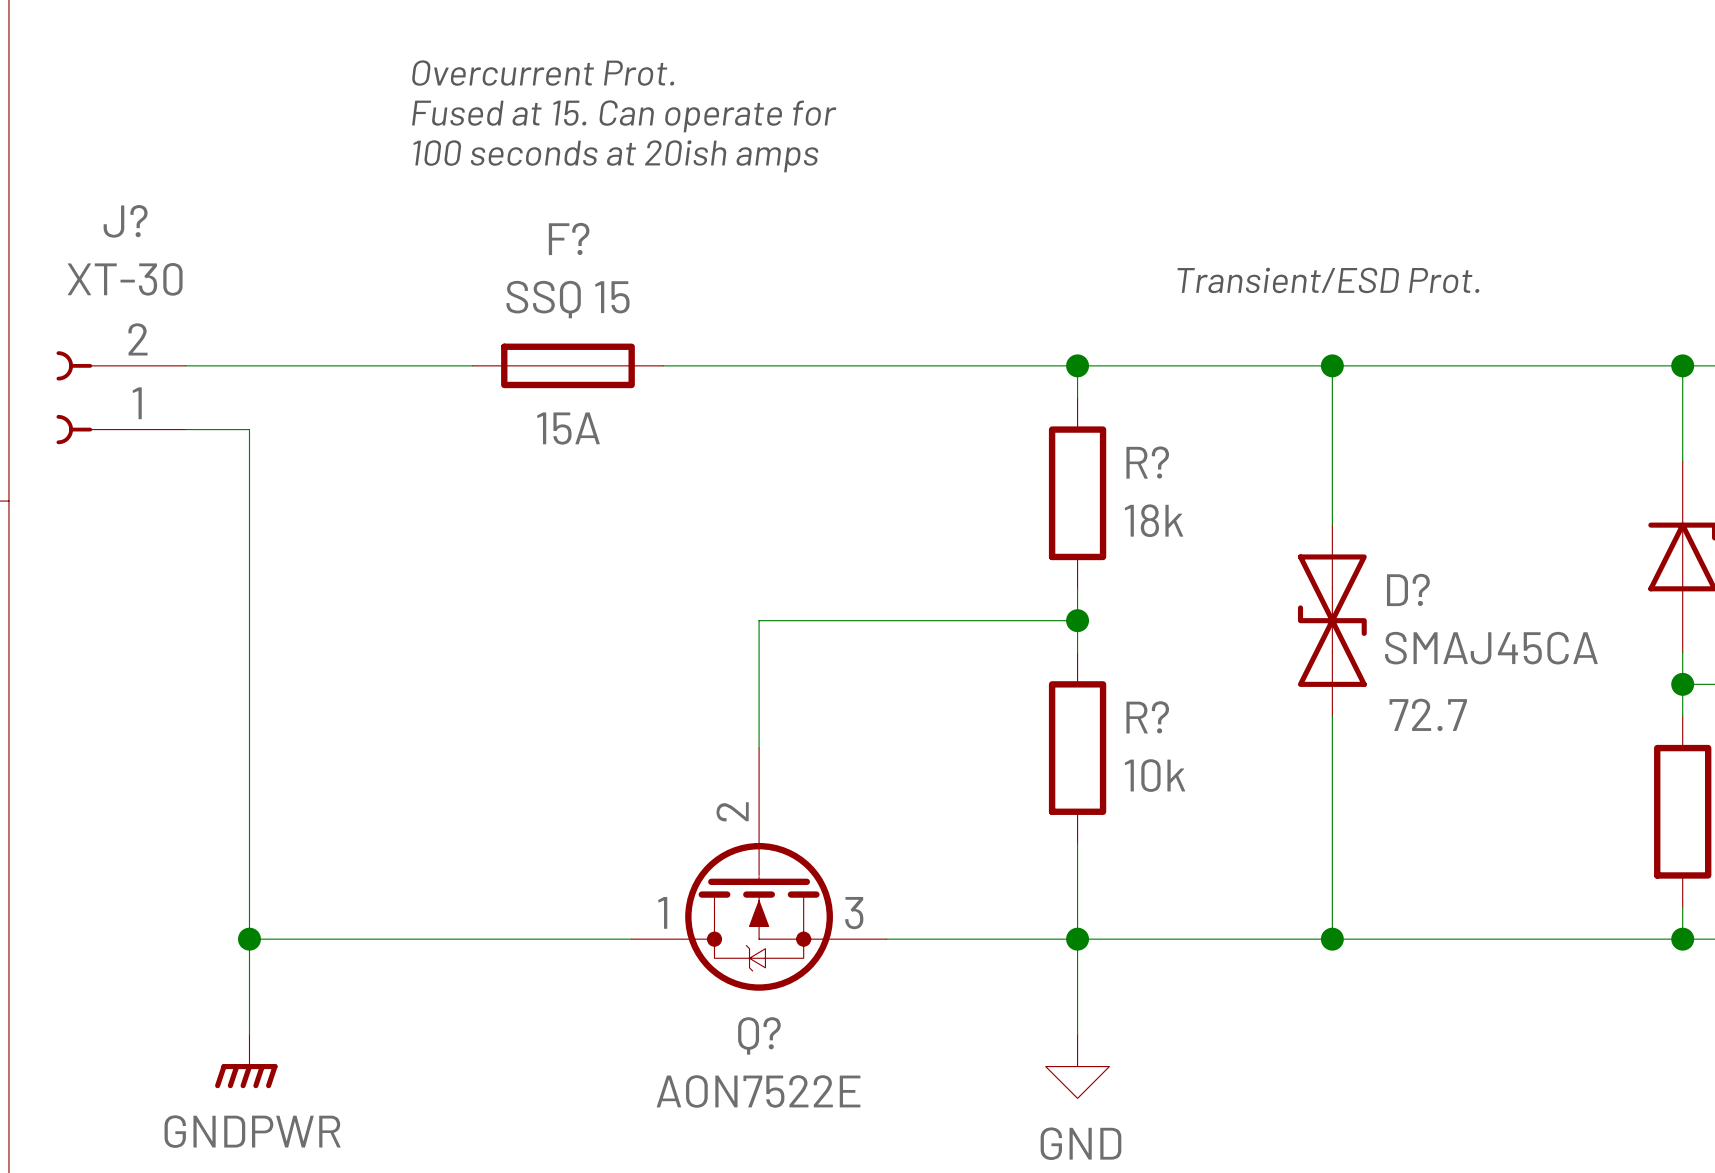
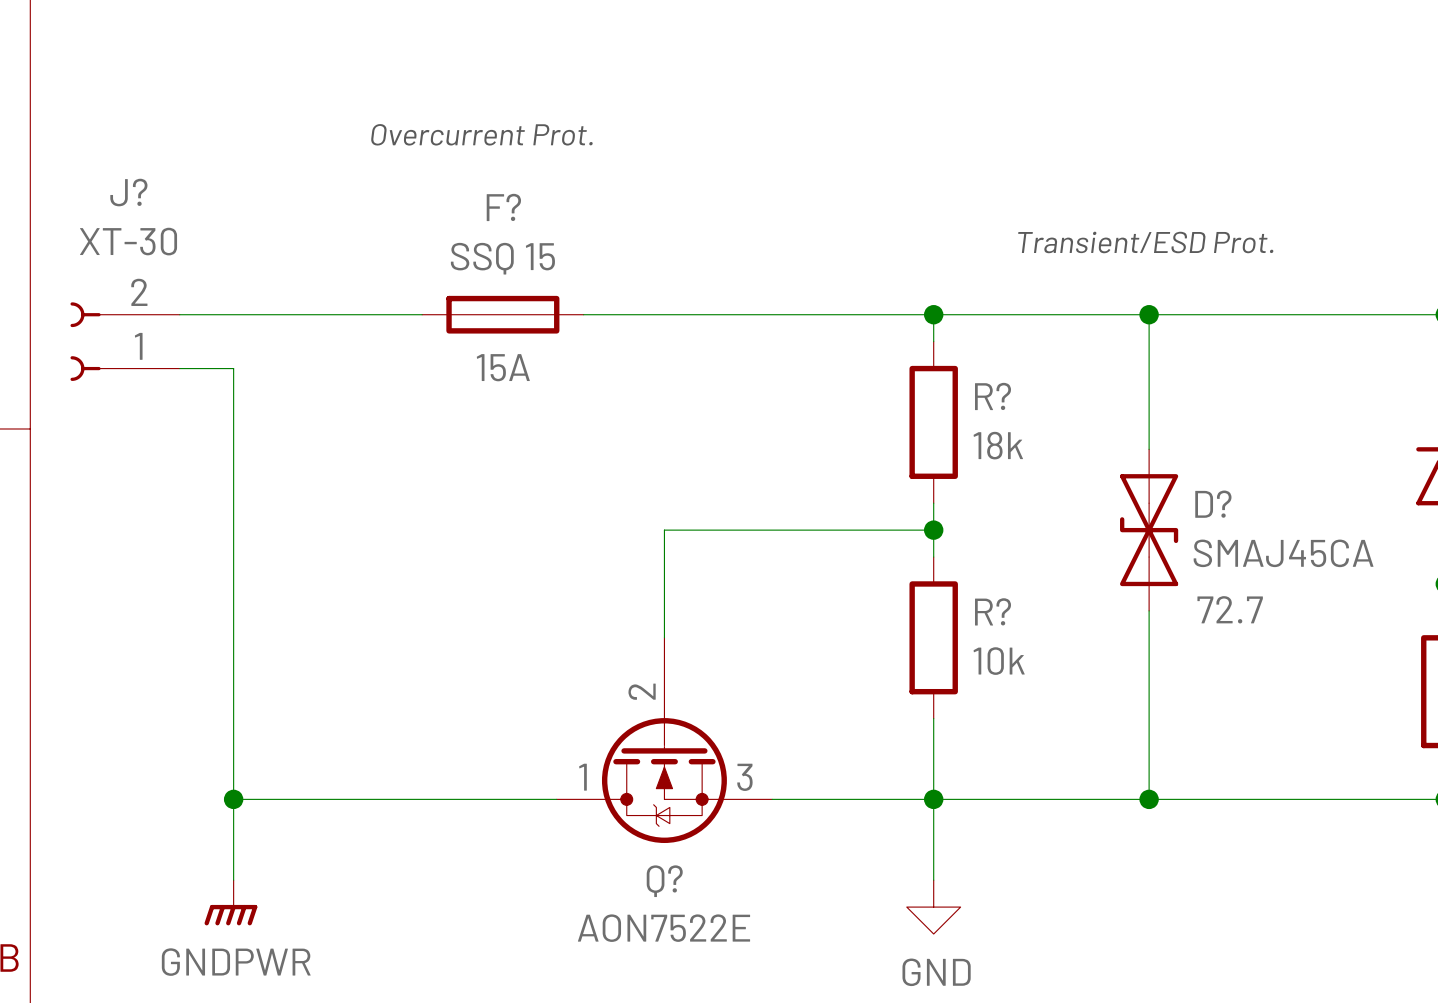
text: Overcurrent Prot. (543, 73) -> none
text: Fused at 15. Can operate for (624, 116) -> none
text: 100 seconds at 20ish amps (615, 156) -> Overcurrent Prot. (481, 134)

